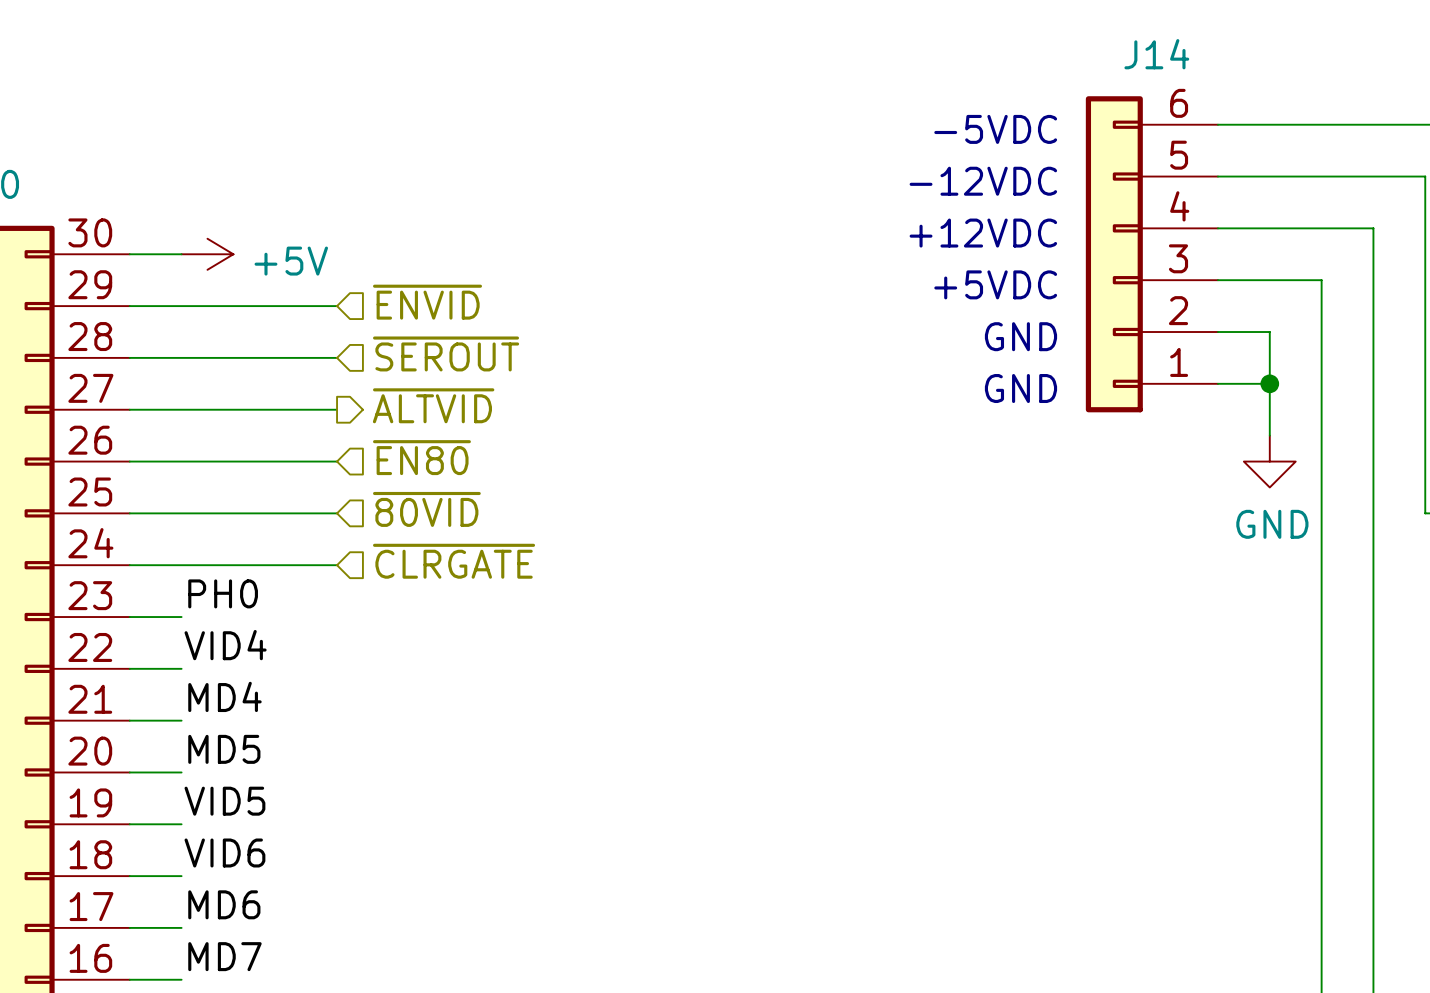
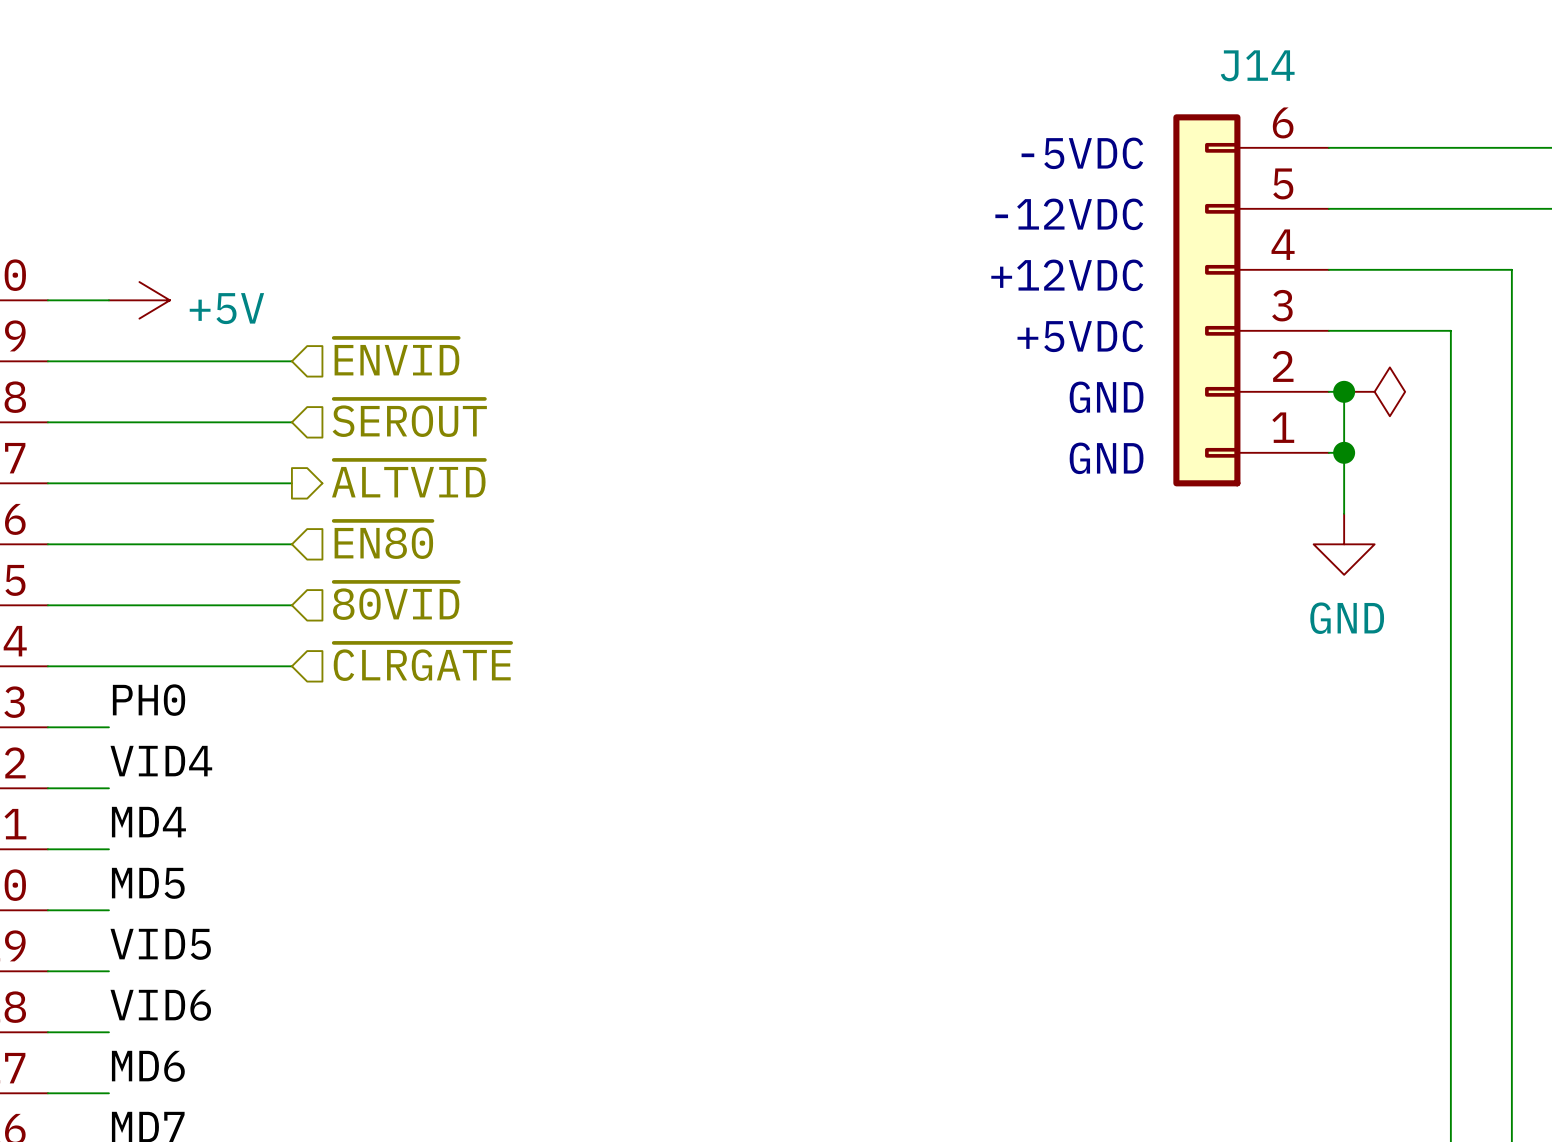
wire: (1230, 332) (1269, 332) (1269, 435) -> (1344, 391) (1344, 513)
junction: none -> (1344, 391)
power symbol: none -> (1374, 391)
wire: (1230, 383) (1269, 383) -> none
junction: none -> (1344, 452)
junction: (1269, 383) -> none
power symbol position: GND (1269, 461) -> GND (1344, 544)

